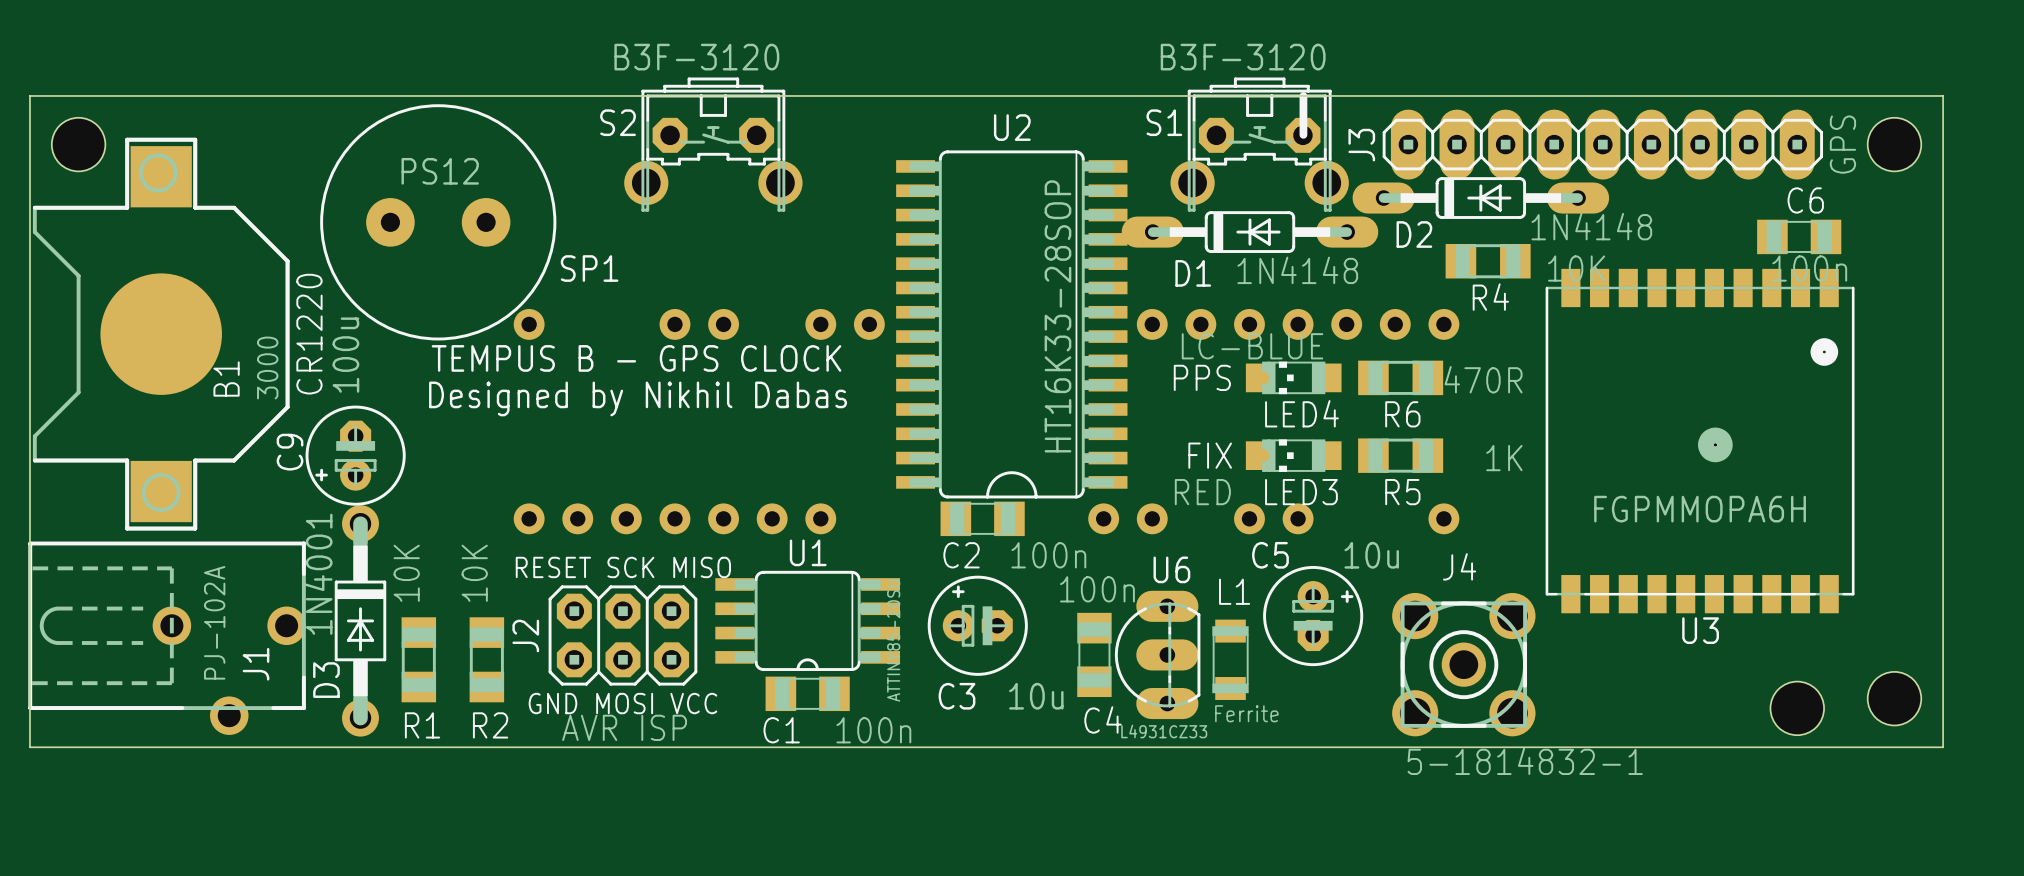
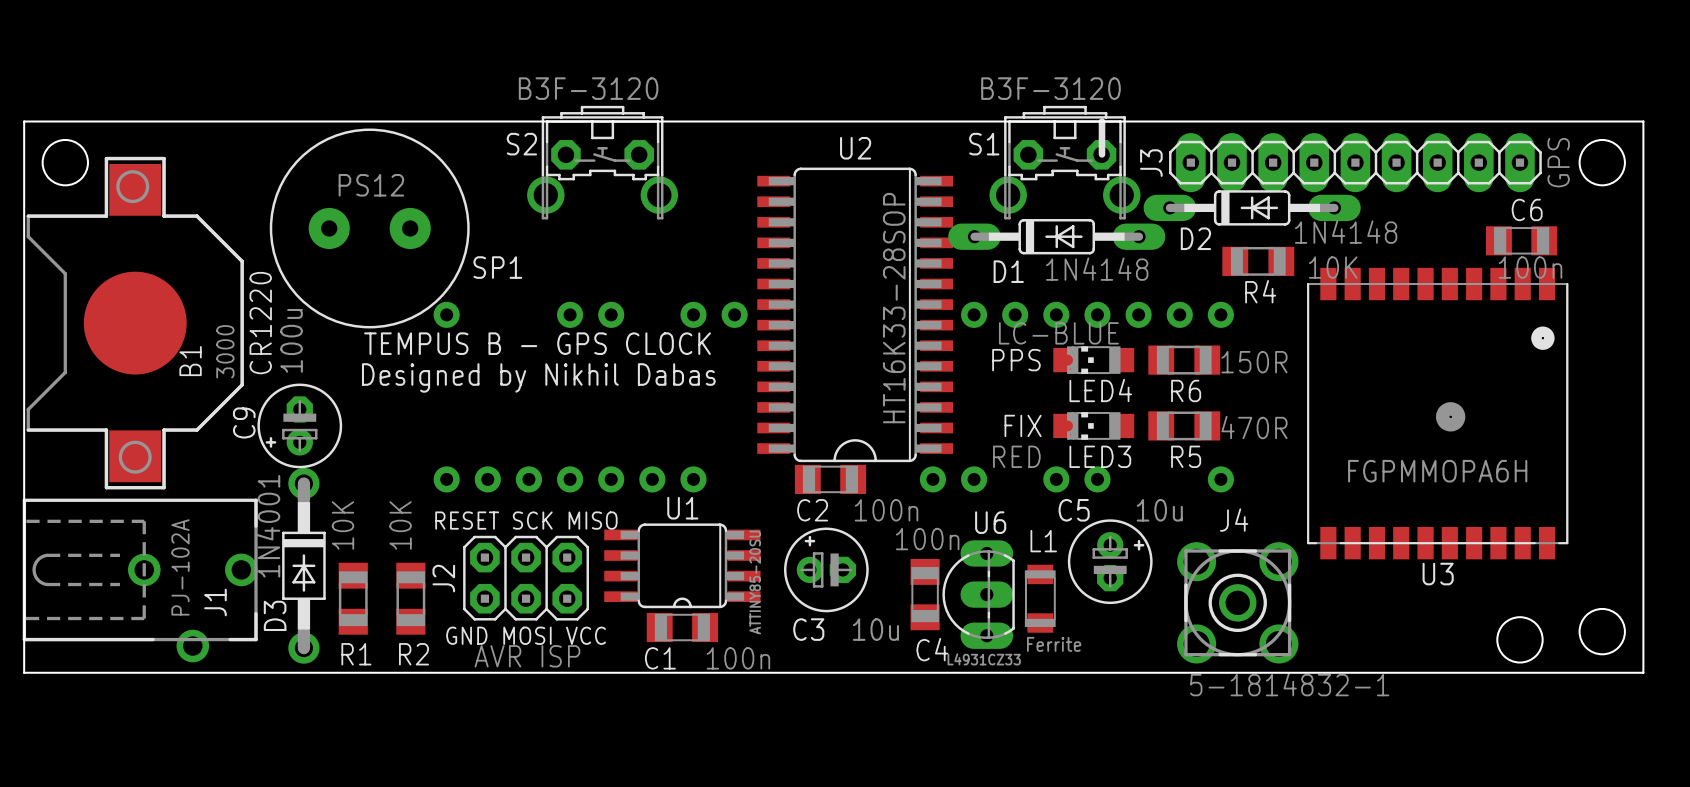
R6 value: 470R (1483, 379) -> 150R (1254, 362)
R5 value: 1K (1504, 458) -> 470R (1254, 427)

